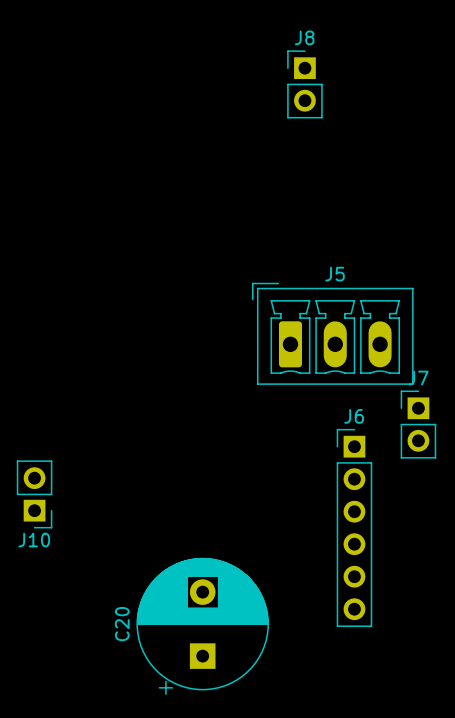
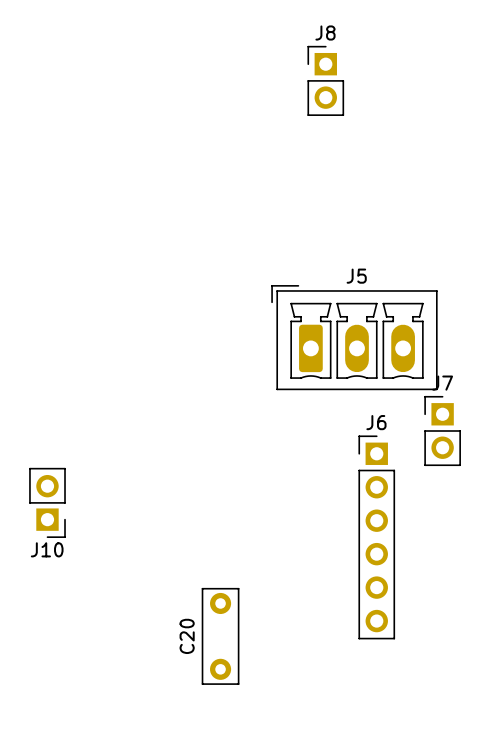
C20 footprint: [136, 557, 269, 695] -> [201, 587, 240, 685]
C20 name position: C20 (122, 624) -> C20 (187, 636)

